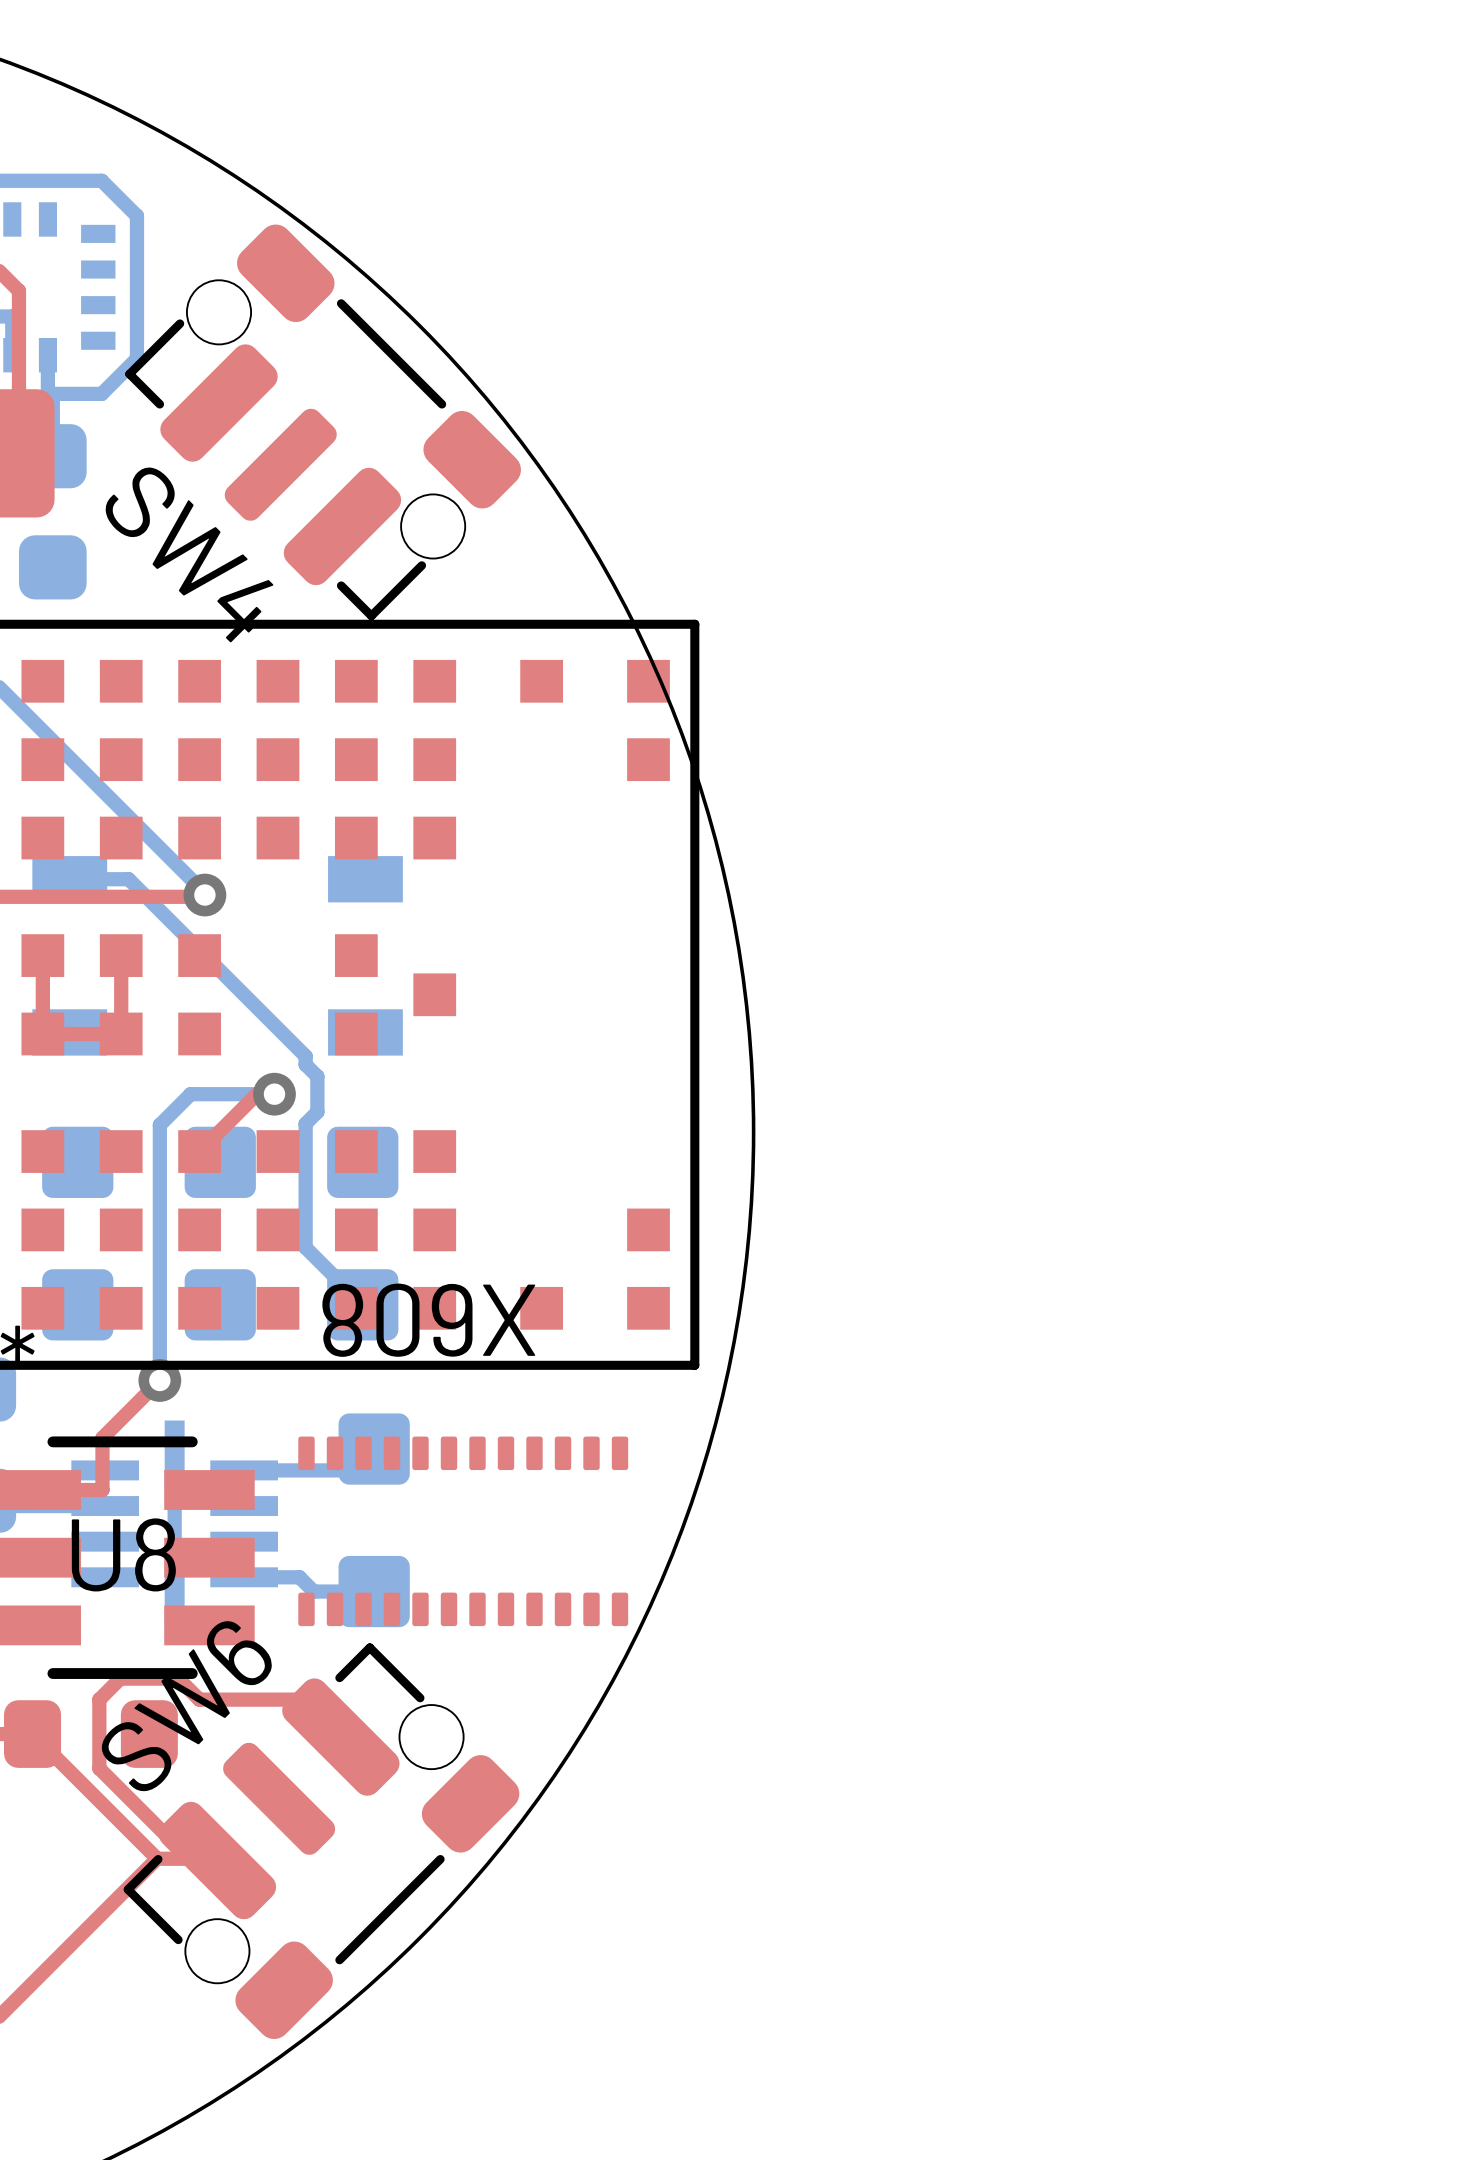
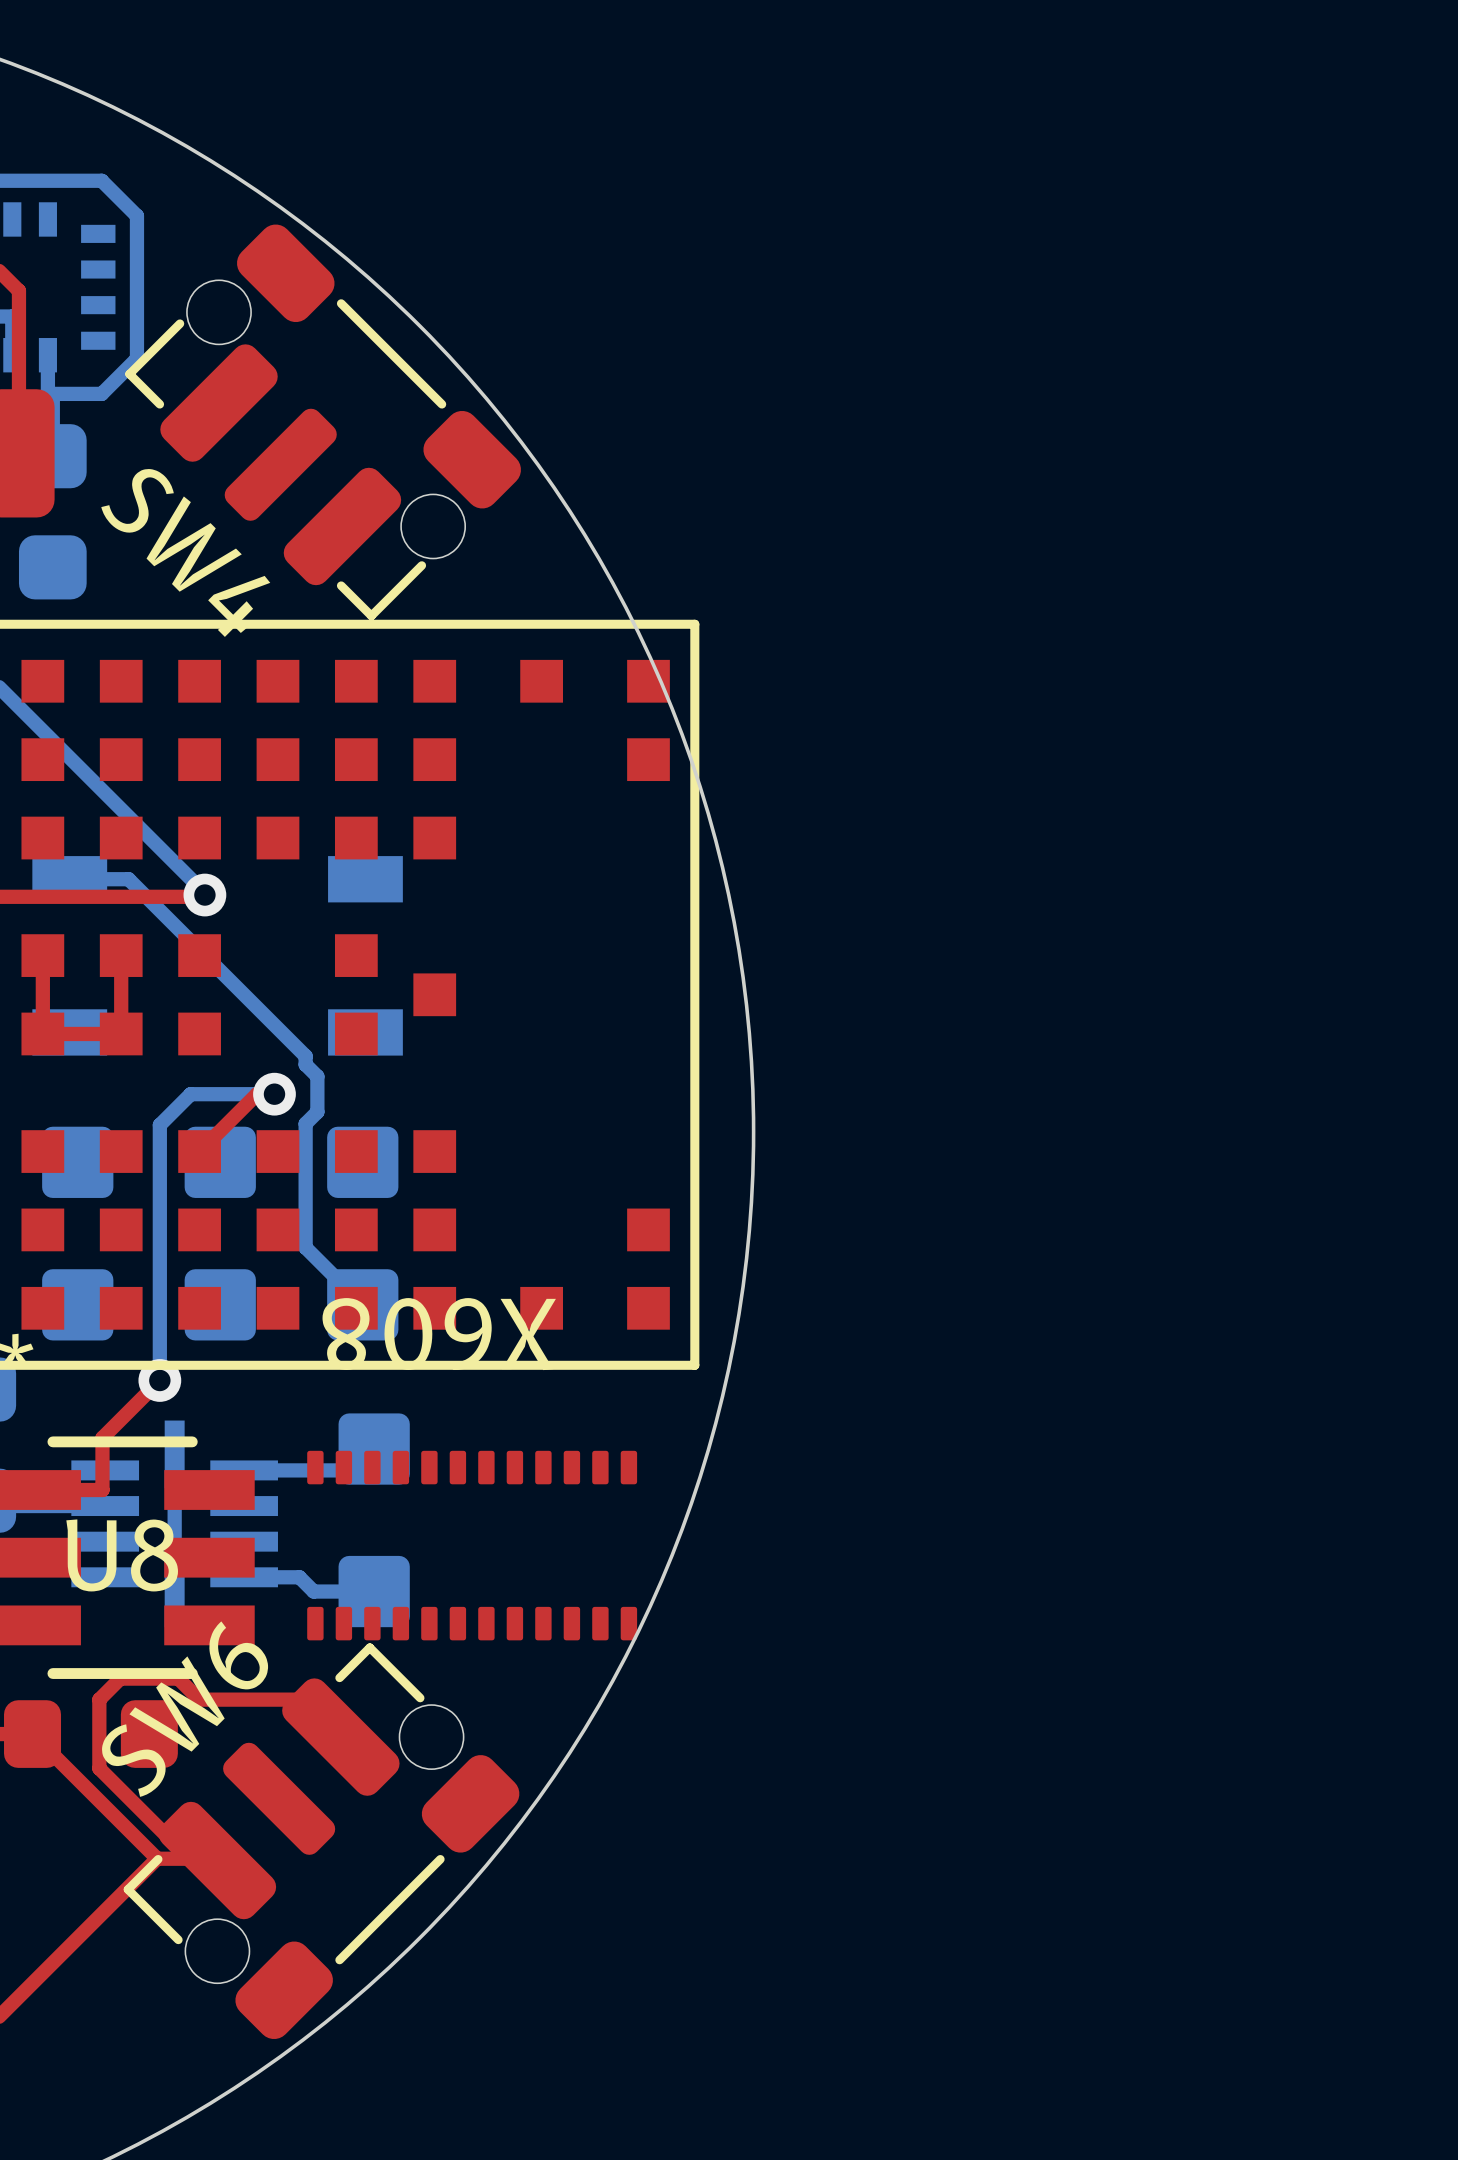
X608 position: (463, 1531) -> (472, 1545)

